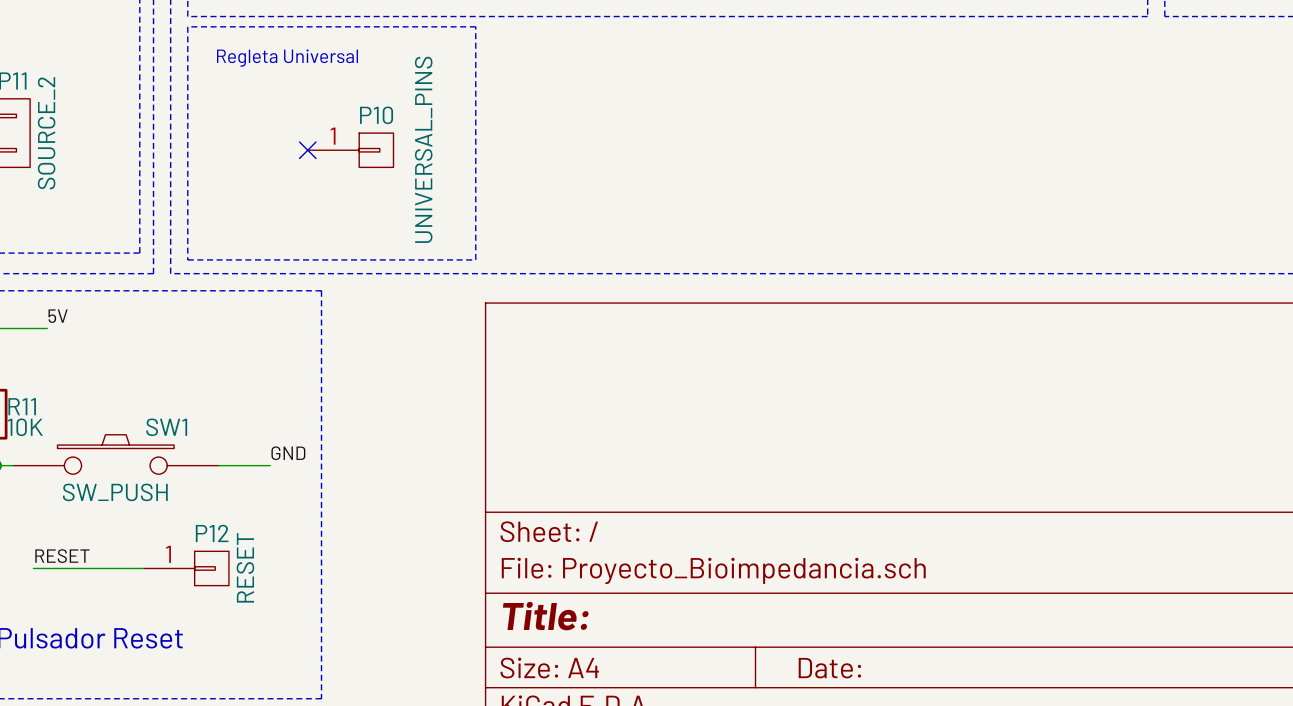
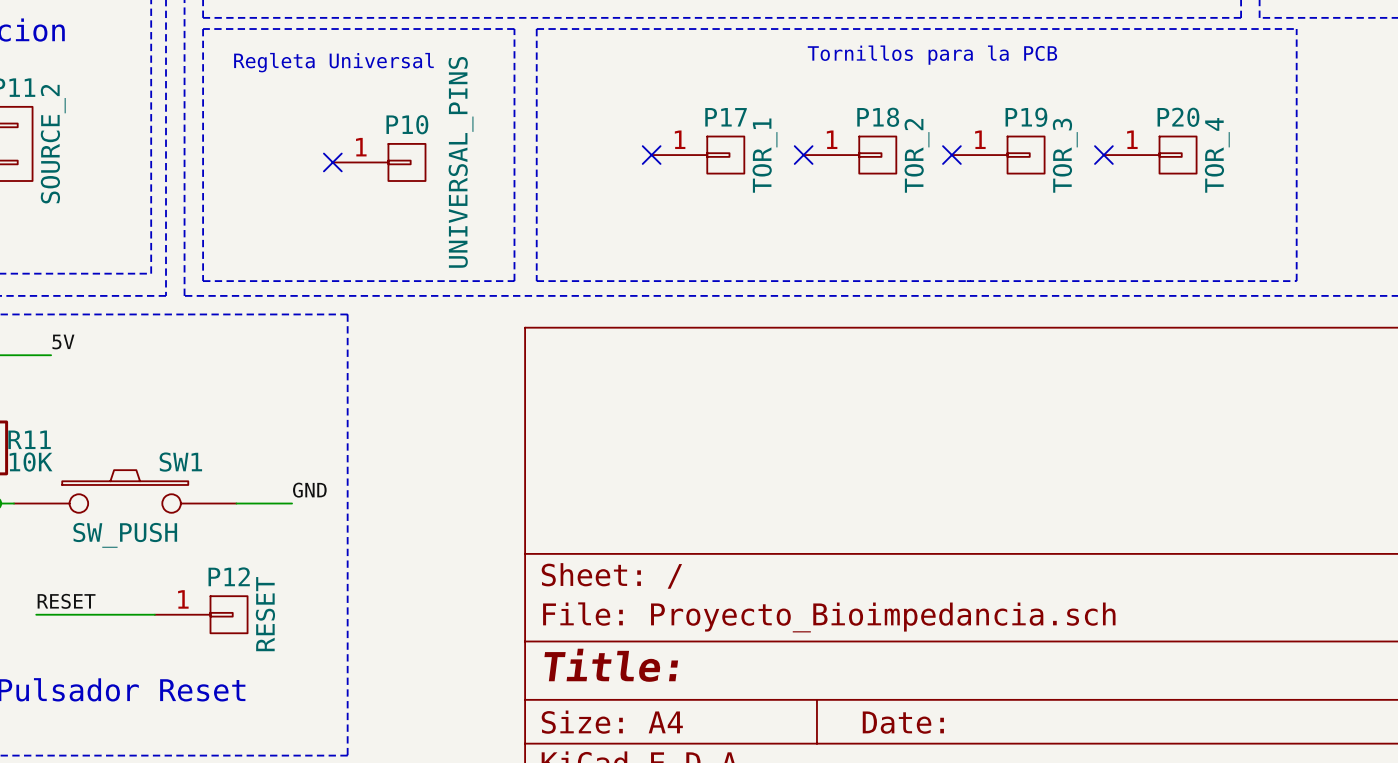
line: none -> (536, 29) (536, 281) (1296, 281) (1296, 29) (536, 29)
text: none -> Tornillos para la PCB (932, 55)
no-connect mark: none -> (651, 155)
P17: none -> TOR_1 (697, 155)
no-connect mark: none -> (803, 155)
P18: none -> TOR_2 (849, 155)
no-connect mark: none -> (951, 155)
P19: none -> TOR_3 (998, 155)
no-connect mark: none -> (1103, 155)
P20: none -> TOR_4 (1150, 155)

